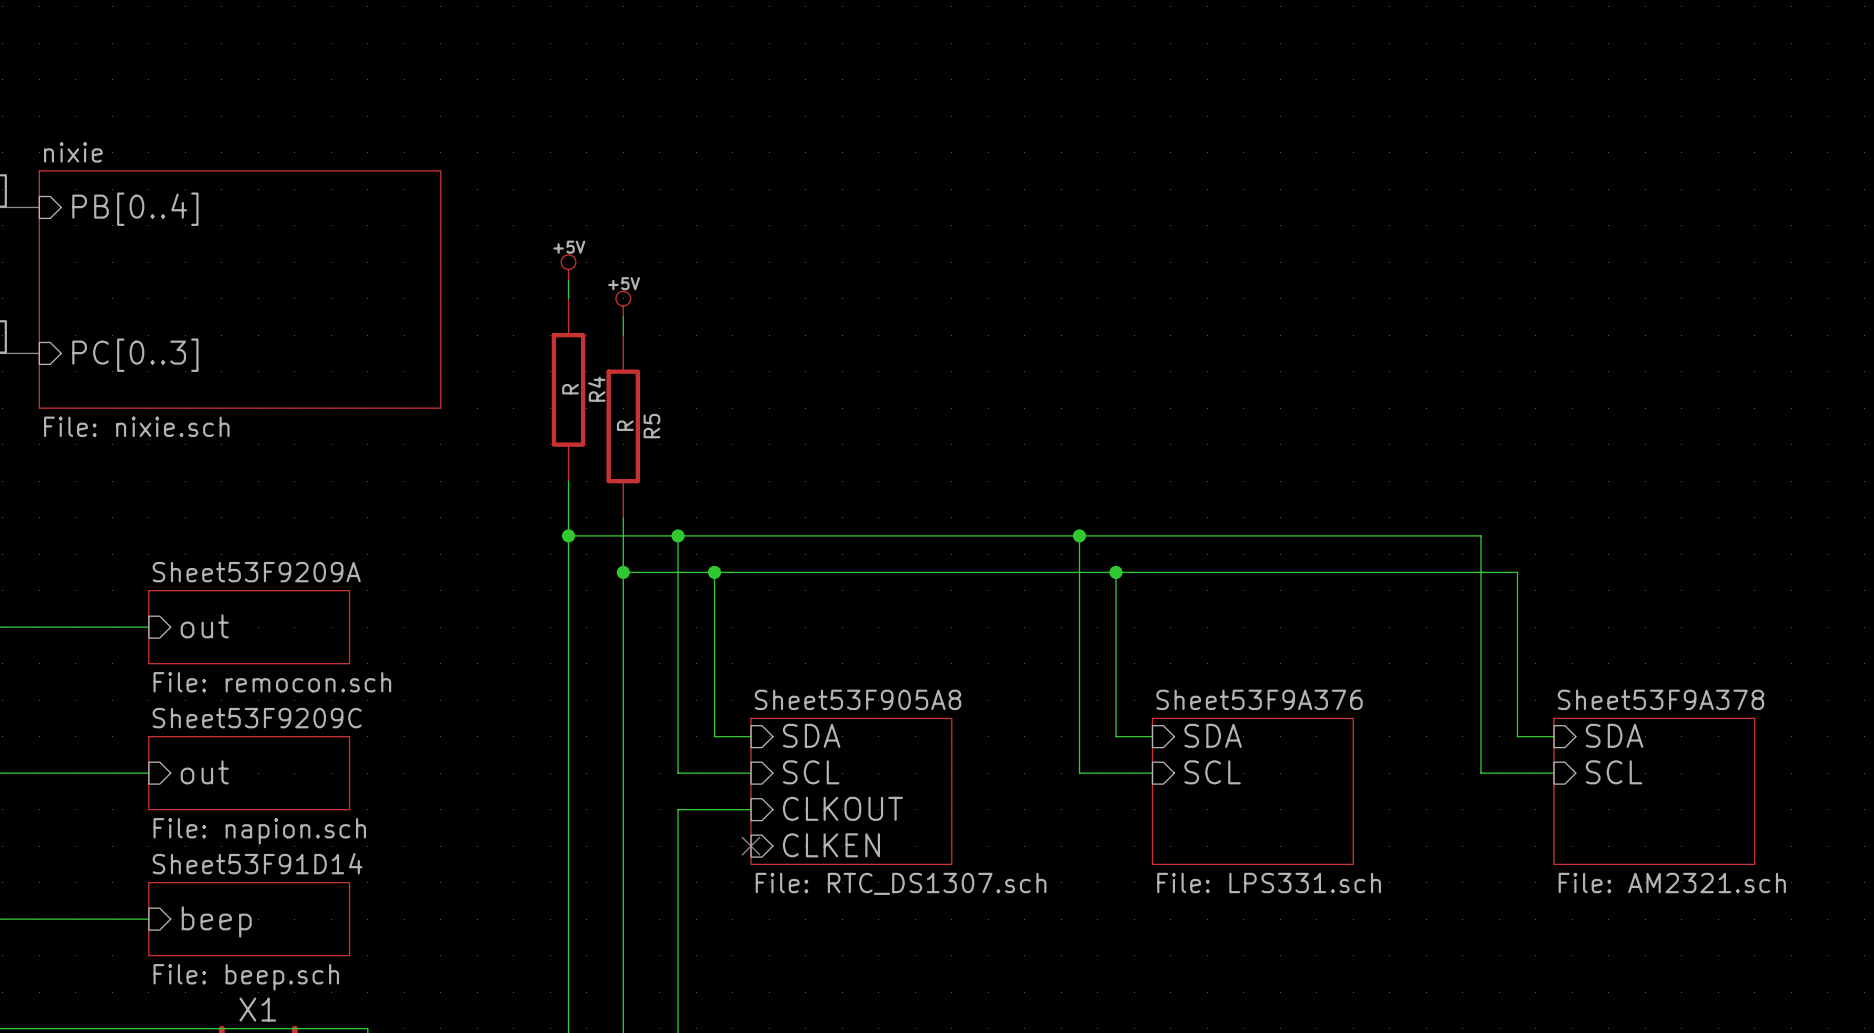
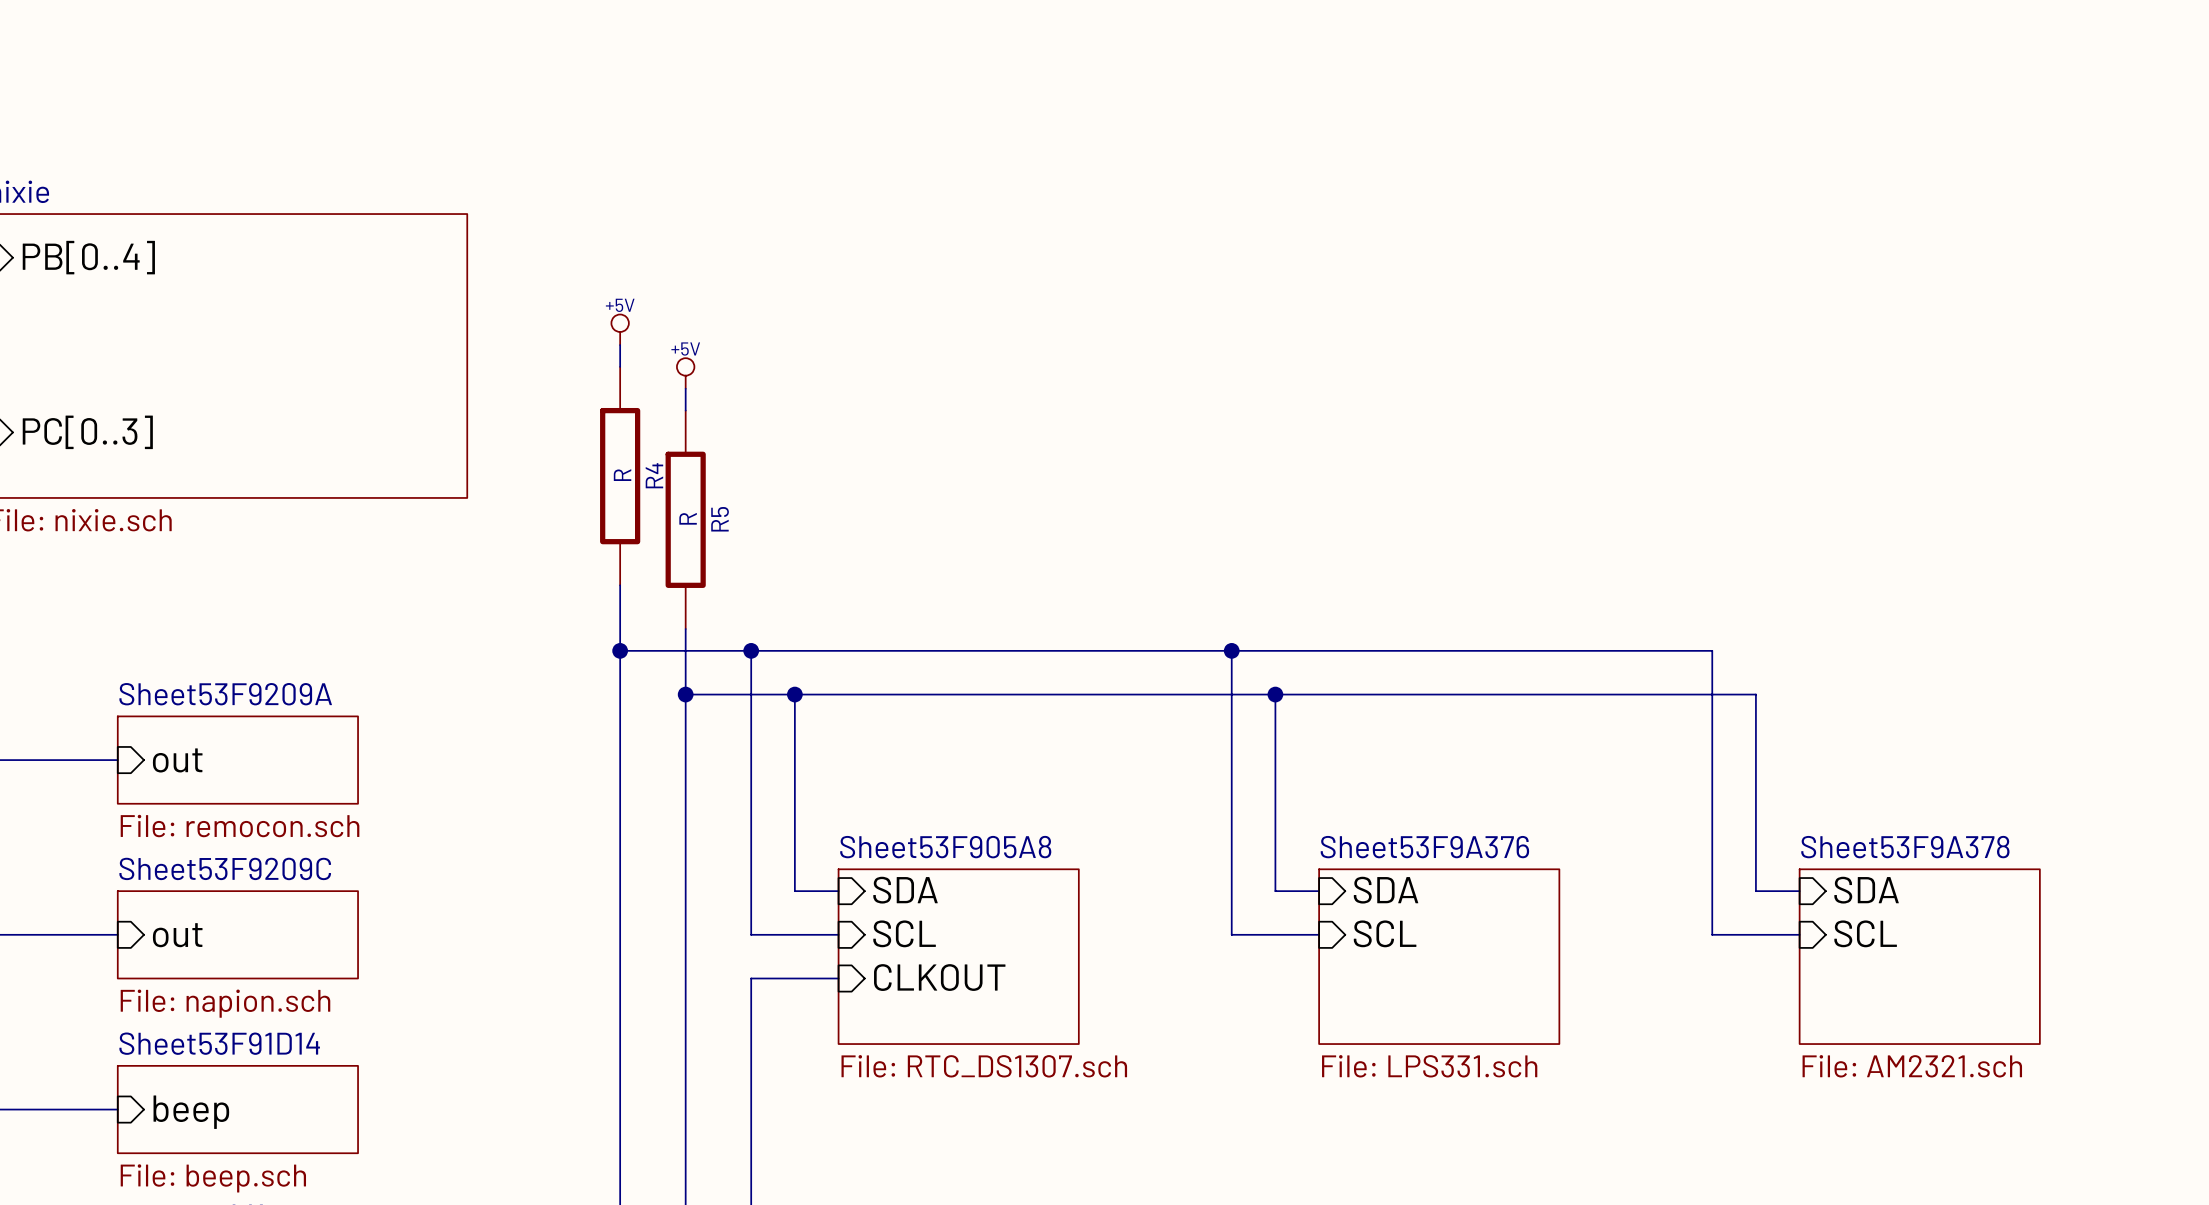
sheet pin: CLKEN (831, 845) -> none
no-connect mark: (751, 846) -> none

